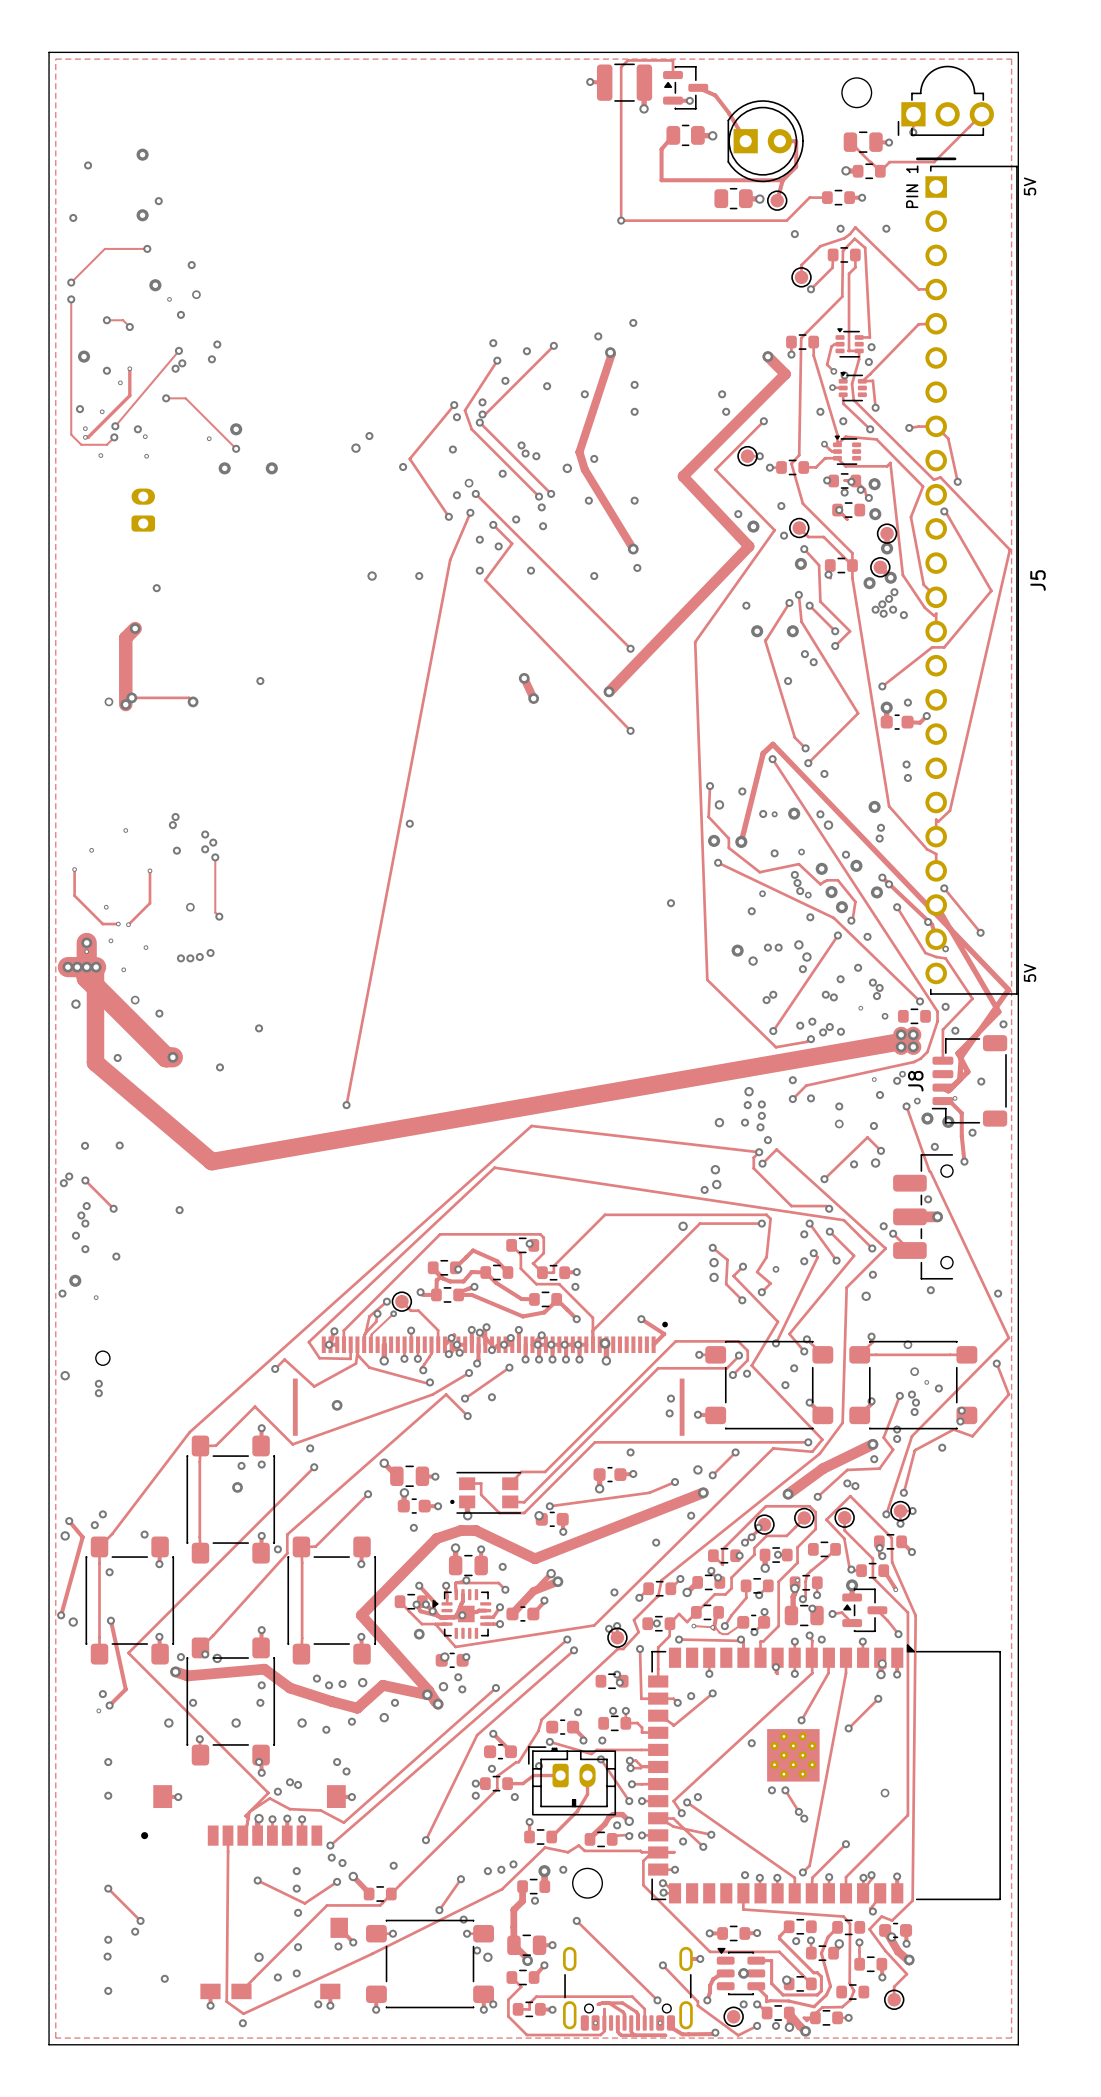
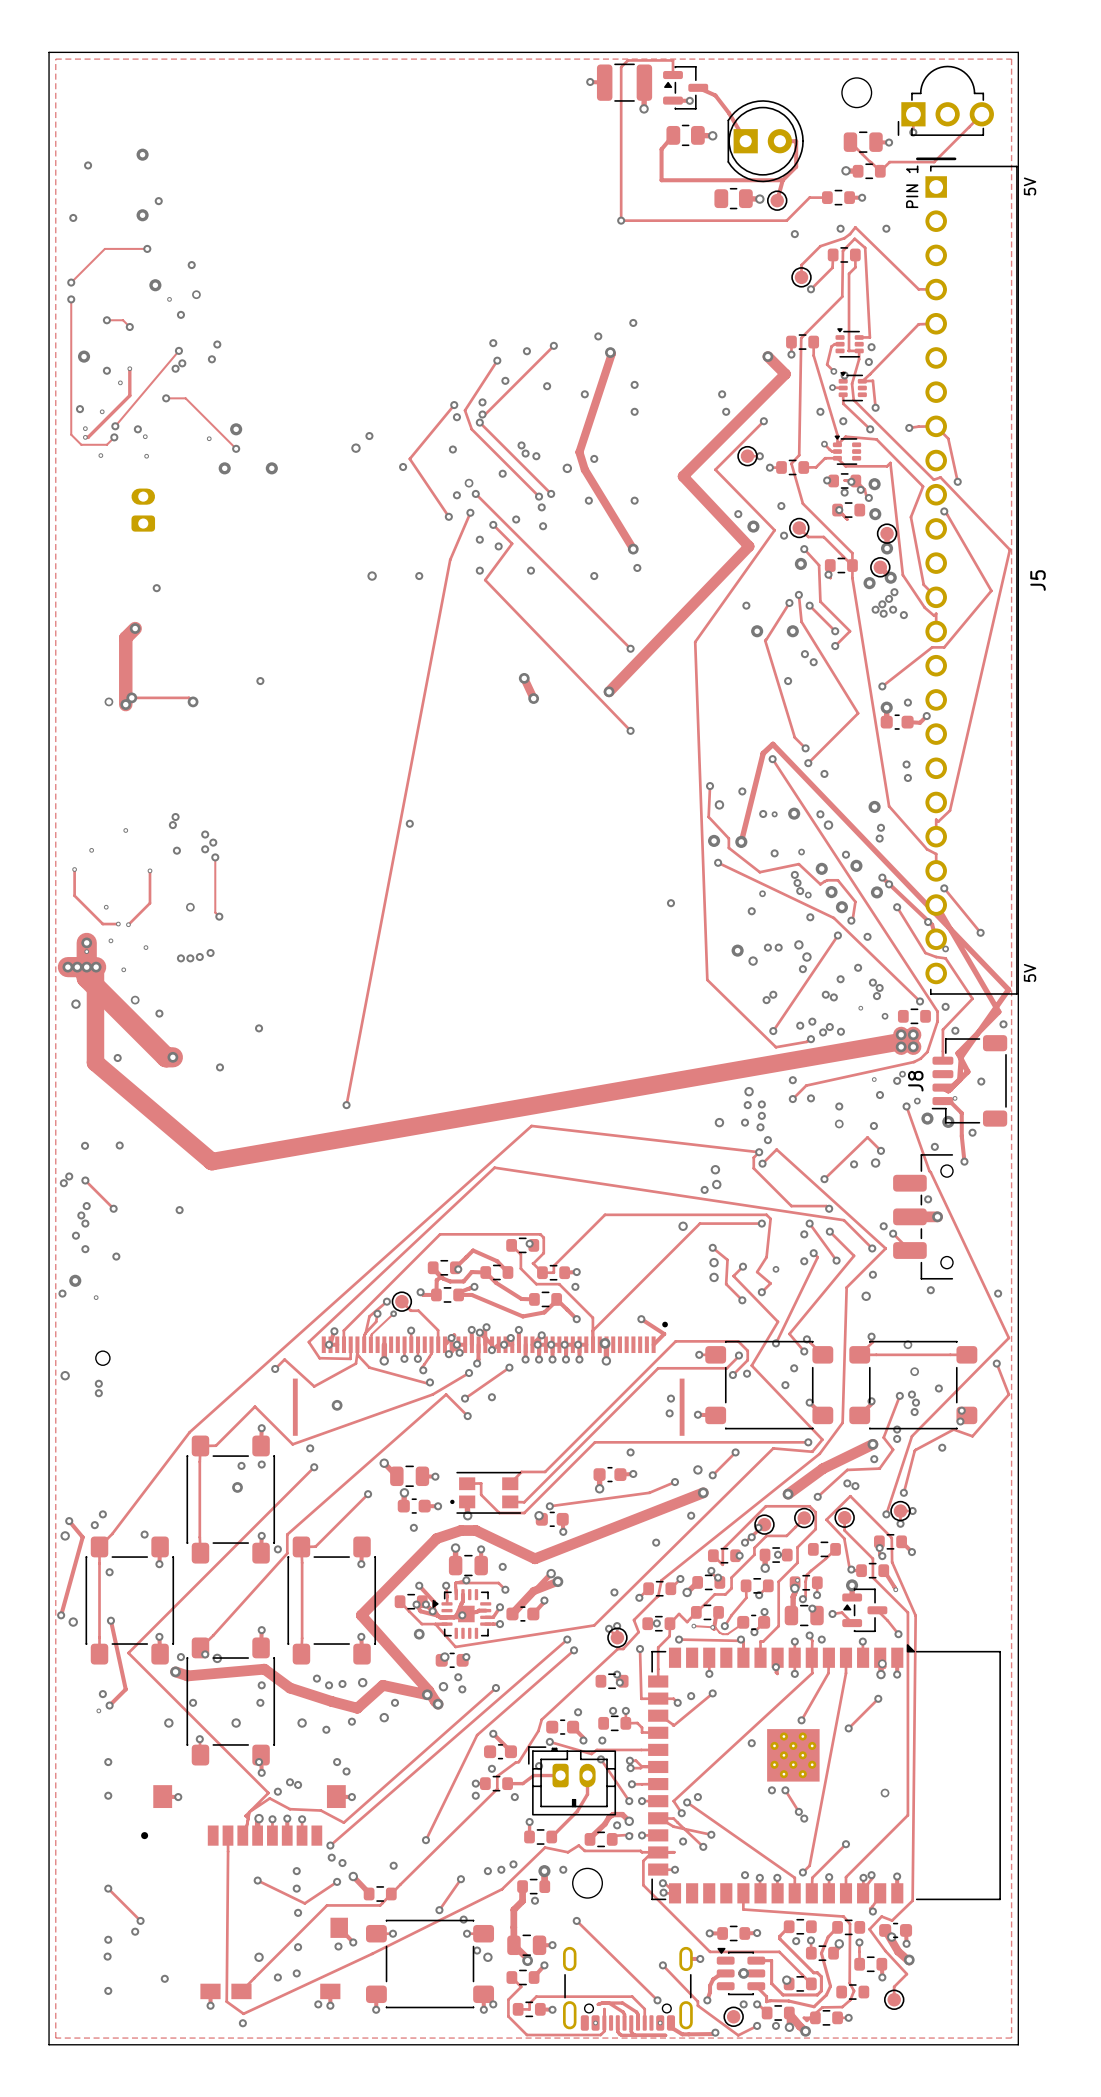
via: (926, 1382) -> none

